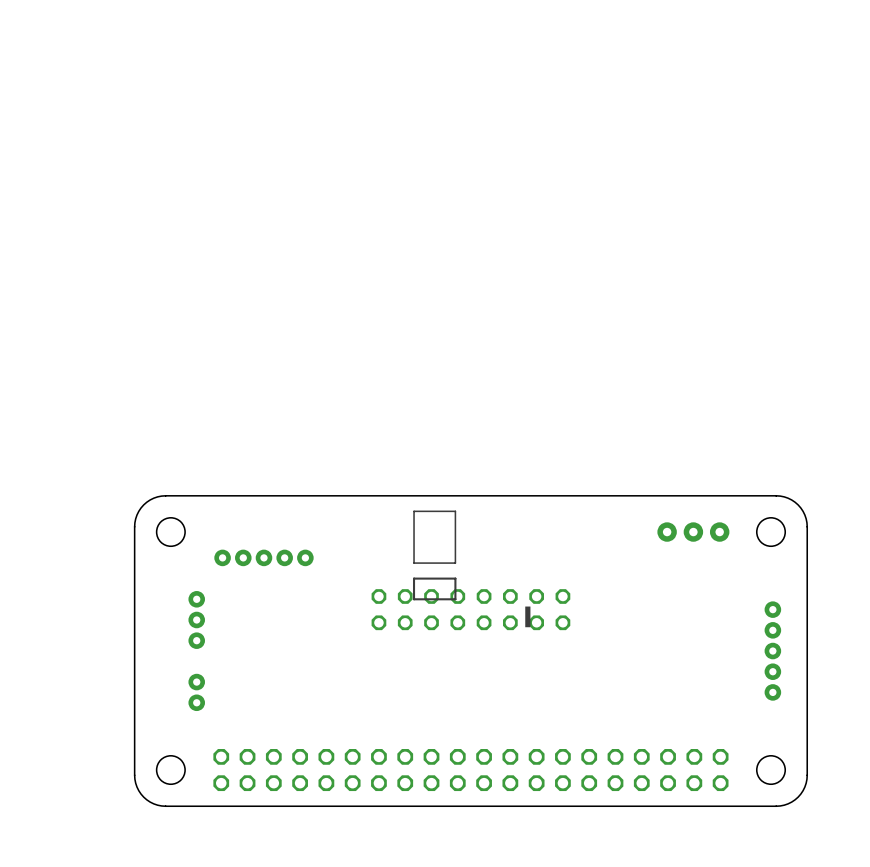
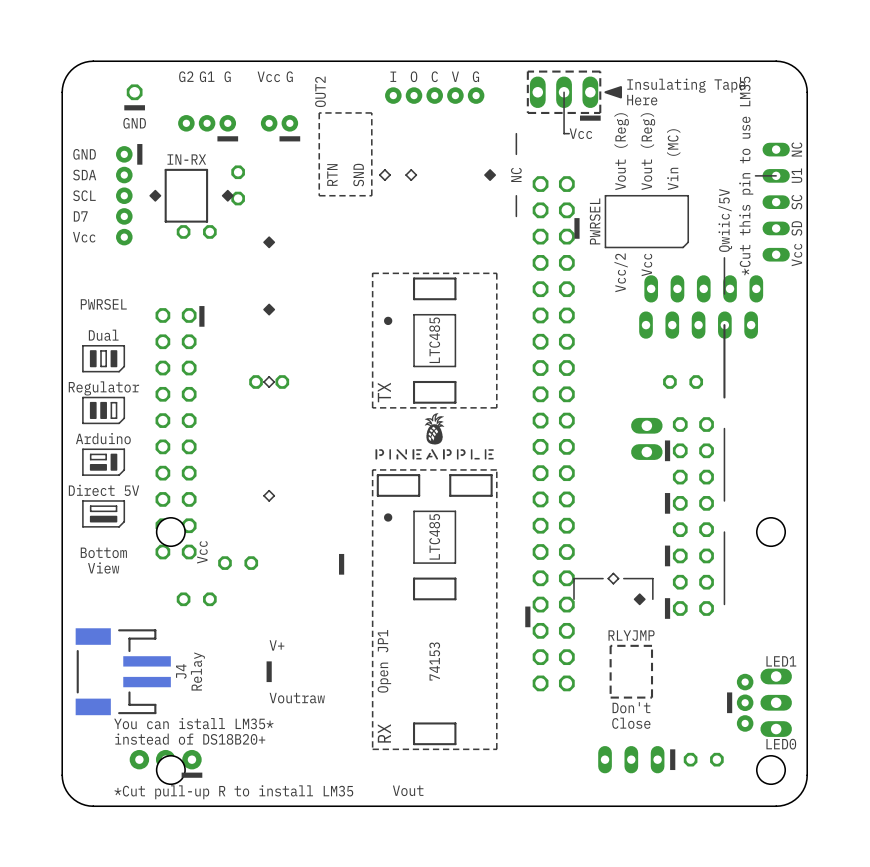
line: none -> (600, 71) (527, 71) (527, 112) (600, 112) (600, 71)
text: none -> G2 (186, 76)
text: none -> G1 (207, 76)
text: none -> G (227, 76)
text: none -> Vcc (268, 76)
text: none -> G (289, 76)
text: none -> I (393, 76)
text: none -> O (414, 76)
text: none -> C (434, 76)
text: none -> V (455, 76)
text: none -> G (475, 76)
text: none -> Insulating Tape (686, 85)
drawing: none -> [604, 86, 623, 99]
text: none -> OUT2 (320, 91)
part: none -> (134, 92)
line: none -> (564, 92) (564, 133) (569, 133)
part: none -> (564, 92)
part: none -> (434, 95)
text: none -> Here (642, 100)
drawing: none -> [124, 105, 145, 111]
line: none -> (371, 112) (319, 112) (319, 195) (371, 195) (371, 112)
drawing: none -> [579, 115, 601, 121]
text: none -> GND (134, 123)
part: none -> (207, 123)
part: none -> (279, 123)
line: none -> (516, 133) (516, 154)
text: none -> Vcc (580, 133)
drawing: none -> [217, 136, 239, 142]
drawing: none -> [279, 136, 301, 142]
drawing: none -> [137, 144, 143, 165]
text: none -> NC (796, 149)
text: none -> Vout (Reg) (621, 151)
text: none -> Vout (Reg) (647, 151)
text: none -> GND (84, 154)
text: none -> IN-RX (186, 159)
text: none -> Vin (MC) (673, 159)
line: none -> (207, 169) (165, 169) (165, 221) (207, 221) (207, 169)
line: none -> (384, 169) (390, 175) (384, 180) (379, 175) (384, 169)
line: none -> (411, 169) (416, 175) (411, 180) (406, 175) (411, 169)
drawing: none -> [484, 169, 497, 182]
text: none -> RTN (332, 174)
text: none -> NC (516, 174)
text: none -> SDA (84, 175)
text: none -> SND (358, 175)
line: none -> (776, 175) (755, 175)
text: none -> U1 (796, 175)
text: none -> *Cut this pin to use LM35 (746, 176)
part: none -> (238, 185)
drawing: none -> [149, 189, 162, 202]
drawing: none -> [221, 189, 234, 202]
text: none -> SCL (84, 195)
part: none -> (124, 195)
line: none -> (516, 195) (516, 216)
line: none -> (688, 195) (605, 195) (605, 247) (683, 247) (688, 242) (688, 195)
part: none -> (776, 202)
text: none -> SC (796, 202)
text: none -> D7 (80, 216)
drawing: none -> [574, 218, 580, 239]
text: none -> Qwiic/5V (725, 220)
text: none -> PWRSEL (595, 221)
text: none -> SD (796, 228)
part: none -> (196, 231)
drawing: none -> [263, 236, 276, 249]
text: none -> Vcc (84, 237)
text: none -> Vcc (796, 255)
line: none -> (724, 257) (724, 294)
text: none -> Vcc (646, 264)
text: none -> Vcc/2 (621, 272)
line: none -> (496, 273) (372, 273) (372, 407) (496, 407) (496, 273)
line: none -> (455, 278) (414, 278) (414, 299) (455, 299) (455, 278)
part: none -> (703, 288)
drawing: none -> [263, 303, 276, 316]
text: none -> PWRSEL (103, 304)
drawing: none -> [199, 306, 205, 327]
line: none -> (455, 314) (414, 314) (414, 366) (455, 366) (455, 314)
drawing: none -> [384, 316, 393, 326]
part: none -> (698, 325)
line: none -> (724, 325) (724, 397)
text: none -> Dual (103, 335)
text: none -> LTC485 (434, 340)
line: none -> (124, 345) (124, 366) (119, 371) (82, 371) (82, 345) (124, 345)
drawing: none -> [89, 350, 97, 368]
line: none -> (106, 350) (101, 350) (101, 366) (106, 366) (106, 350)
drawing: none -> [110, 350, 118, 368]
line: none -> (269, 376) (263, 381) (269, 387) (274, 381) (269, 376)
part: none -> (269, 381)
line: none -> (455, 381) (455, 402) (414, 402) (414, 381) (455, 381)
part: none -> (683, 381)
text: none -> Regulator (103, 388)
text: none -> TX (384, 392)
line: none -> (124, 397) (124, 418) (119, 423) (82, 423) (82, 397) (124, 397)
drawing: none -> [89, 401, 107, 419]
line: none -> (116, 402) (116, 418) (111, 418) (111, 402) (116, 402)
drawing: none -> [375, 412, 494, 460]
line: none -> (724, 428) (724, 500)
part: none -> (176, 433)
part: none -> (553, 433)
text: none -> Arduino (103, 438)
part: none -> (646, 438)
drawing: none -> [664, 440, 671, 462]
line: none -> (124, 449) (124, 469) (119, 475) (82, 475) (82, 449) (124, 449)
drawing: none -> [89, 453, 118, 471]
line: none -> (106, 454) (106, 459) (90, 459) (90, 454) (106, 454)
line: none -> (496, 469) (496, 749) (372, 749) (372, 469) (496, 469)
line: none -> (419, 475) (377, 475) (377, 495) (419, 495) (419, 475)
line: none -> (491, 475) (450, 475) (450, 495) (491, 495) (491, 475)
text: none -> Direct 5V (103, 490)
line: none -> (269, 490) (274, 495) (269, 500) (263, 495) (269, 490)
drawing: none -> [664, 493, 671, 514]
line: none -> (124, 500) (124, 521) (119, 526) (82, 526) (82, 500) (124, 500)
line: none -> (116, 506) (116, 511) (90, 511) (90, 506) (116, 506)
drawing: none -> [384, 513, 393, 522]
drawing: none -> [89, 515, 118, 523]
board edge: (807, 526) (804, 514) (798, 504) (788, 498) (776, 495) (165, 495) (153, 498) (141, 507) (134, 522) (134, 775) (137, 787) (143, 797) (153, 803) (165, 806) -> (807, 526) (807, 92) (803, 76) (791, 65) (776, 61) (93, 61) (81, 63) (68, 73) (63, 84) (62, 92) (62, 779) (68, 794) (74, 799) (85, 805) (165, 806)
part: (693, 532) -> none
line: none -> (724, 532) (724, 604)
text: none -> LTC485 (434, 536)
drawing: none -> [664, 545, 671, 567]
text: none -> Bottom (103, 552)
text: none -> Vcc (202, 552)
drawing: none -> [339, 553, 345, 575]
part: (263, 557) -> none
part: none -> (238, 563)
text: none -> View (103, 567)
line: none -> (613, 573) (618, 578) (613, 583) (608, 578) (613, 573)
line: none -> (603, 578) (573, 578) (573, 599)
line: none -> (623, 578) (652, 578) (652, 599)
drawing: none -> [633, 593, 646, 606]
drawing: none -> [664, 598, 671, 619]
part: none -> (196, 599)
part rotation: 0° (470, 609) -> 90° clockwise (693, 516)
part position: (470, 609) -> (693, 516)
part: (196, 619) -> none
text: none -> RLYJMP (631, 635)
text: none -> V+ (276, 645)
line: none -> (652, 645) (610, 645) (610, 697) (652, 697) (652, 645)
part: (772, 651) -> none
drawing: none -> [266, 661, 272, 683]
text: none -> Open JP1 (384, 661)
text: none -> 74153 (434, 661)
text: none -> LED1 (781, 661)
J4: none -> (123, 671)
text: none -> Relay (197, 671)
part: (196, 692) -> none
drawing: none -> [727, 692, 733, 714]
text: none -> Voutraw (297, 698)
part: none -> (745, 702)
part: none -> (776, 702)
text: none -> Don't (631, 707)
text: none -> You can istall LM35* (193, 723)
line: none -> (455, 723) (455, 744) (414, 744) (414, 723) (455, 723)
text: none -> Close (631, 723)
text: none -> RX (384, 733)
text: none -> instead of DS18B20+ (190, 739)
text: none -> LED0 (781, 744)
drawing: none -> [670, 749, 676, 771]
part: none -> (165, 759)
part: none -> (631, 759)
part: none -> (703, 759)
part: (470, 770) -> none
drawing: none -> [181, 772, 203, 778]
text: none -> Vout (408, 790)
text: none -> *Cut pull-up R to install LM35 (233, 792)

